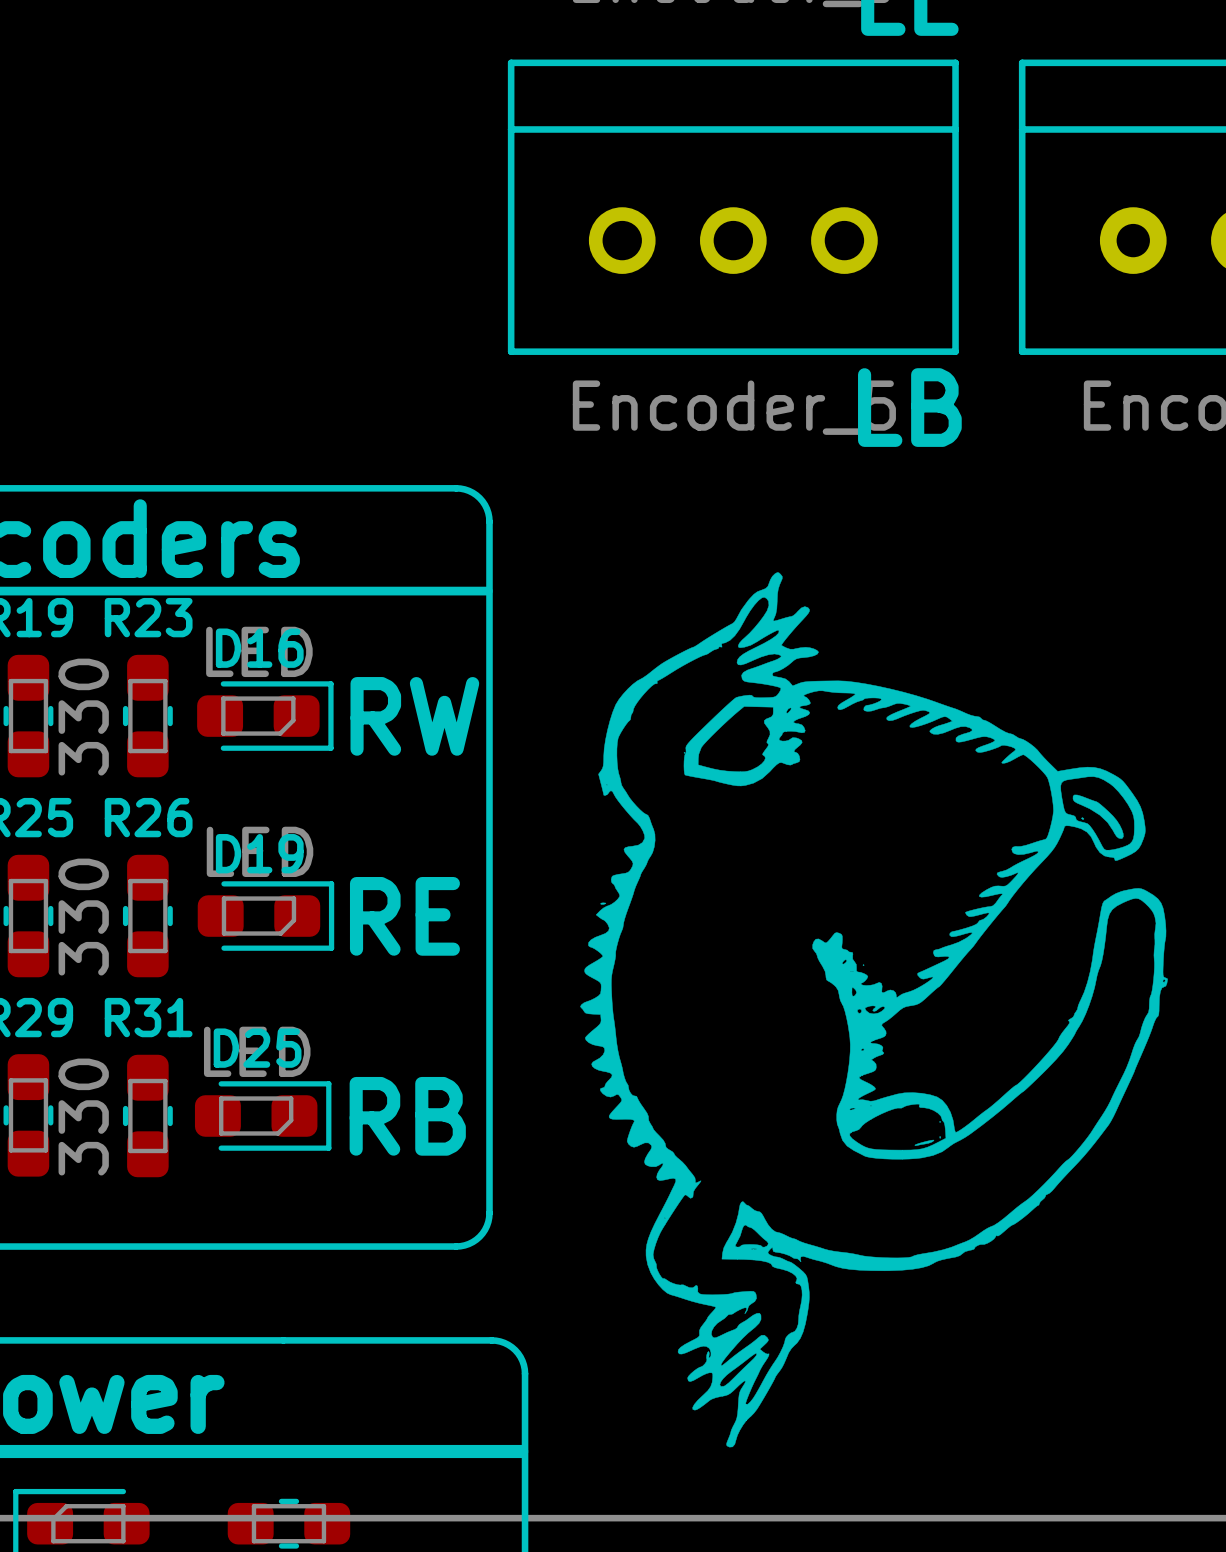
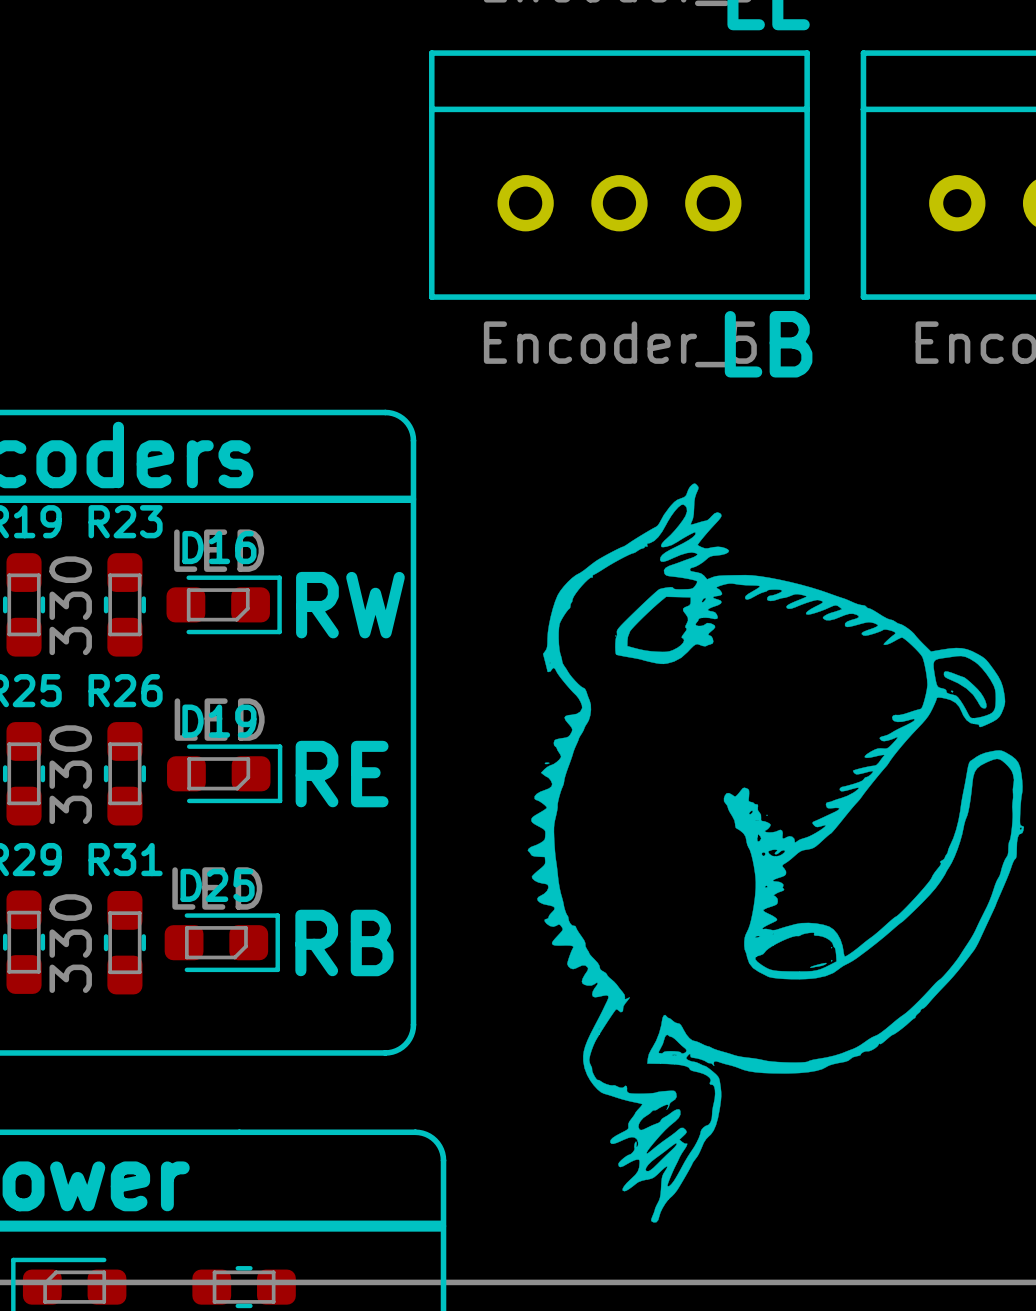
drawing position: (874, 1009) -> (775, 853)

